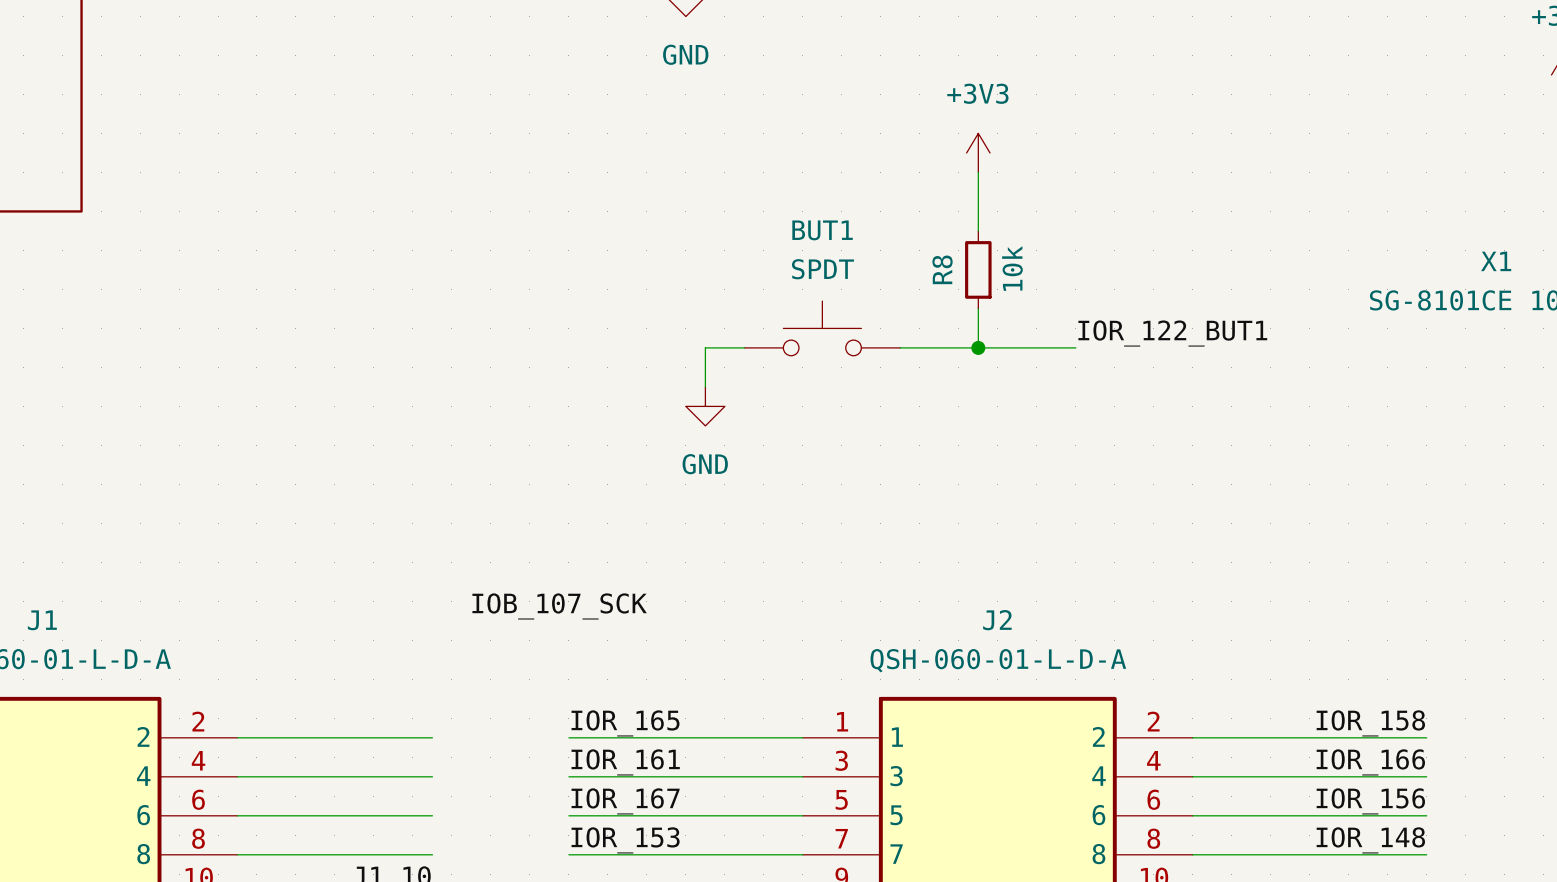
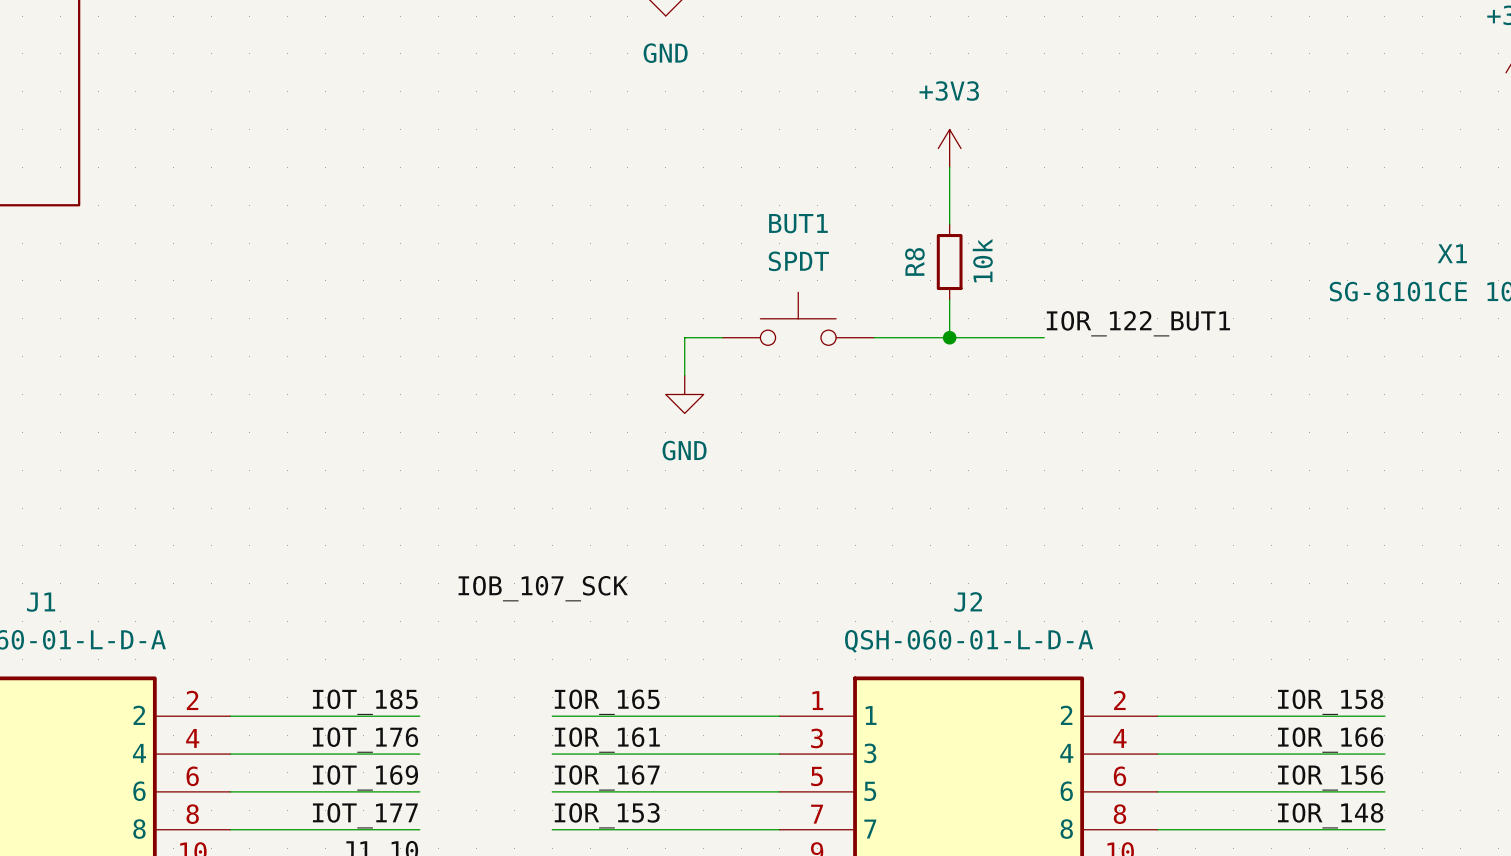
label: none -> IOT_185 (365, 702)
label: none -> IOT_176 (365, 740)
label: none -> IOT_169 (365, 777)
label: none -> IOT_177 (365, 815)

